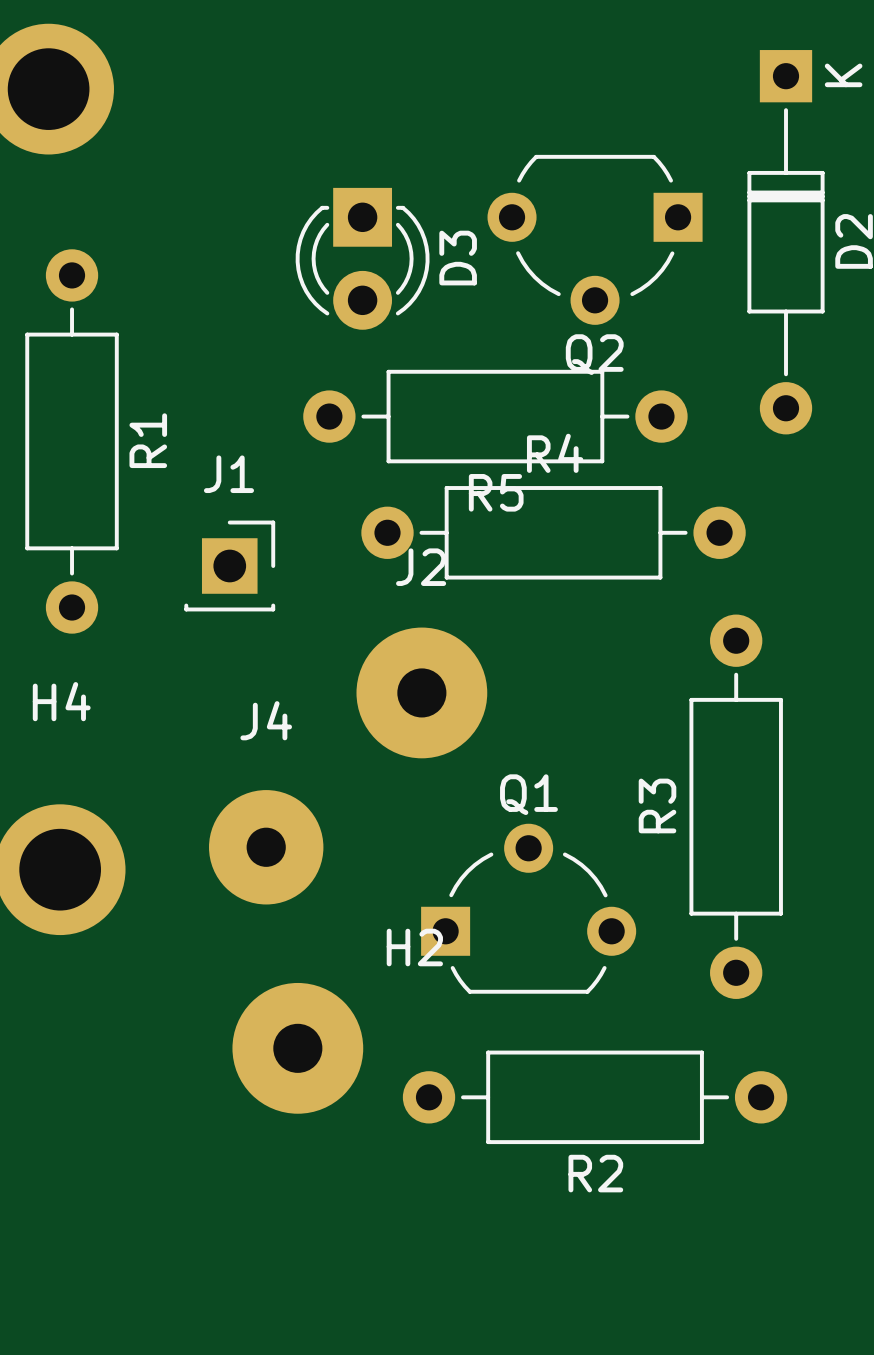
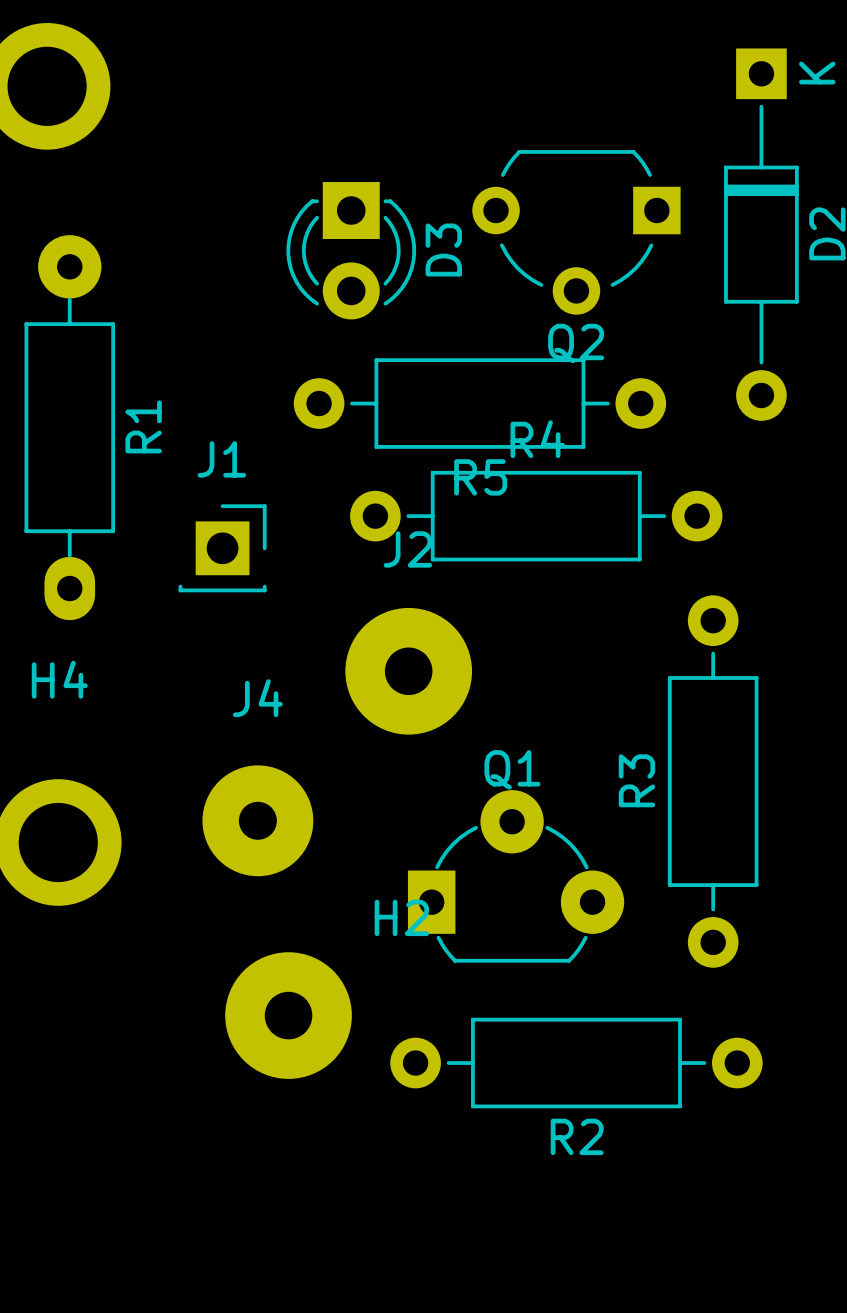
R1 footprint: [25, 249, 119, 634] -> [24, 235, 116, 621]
Q1 footprint: [421, 823, 637, 994] -> [407, 790, 625, 963]

